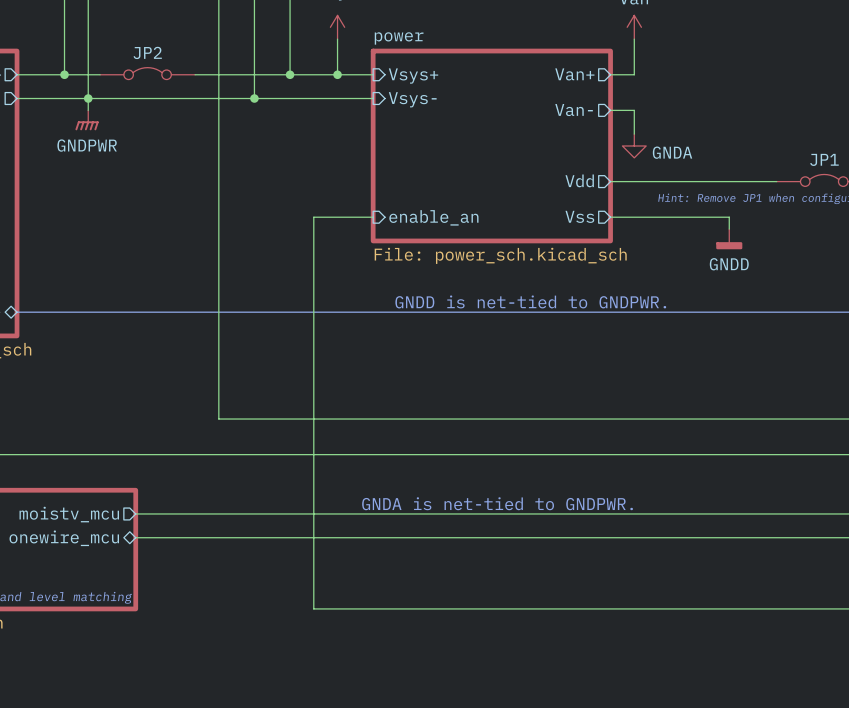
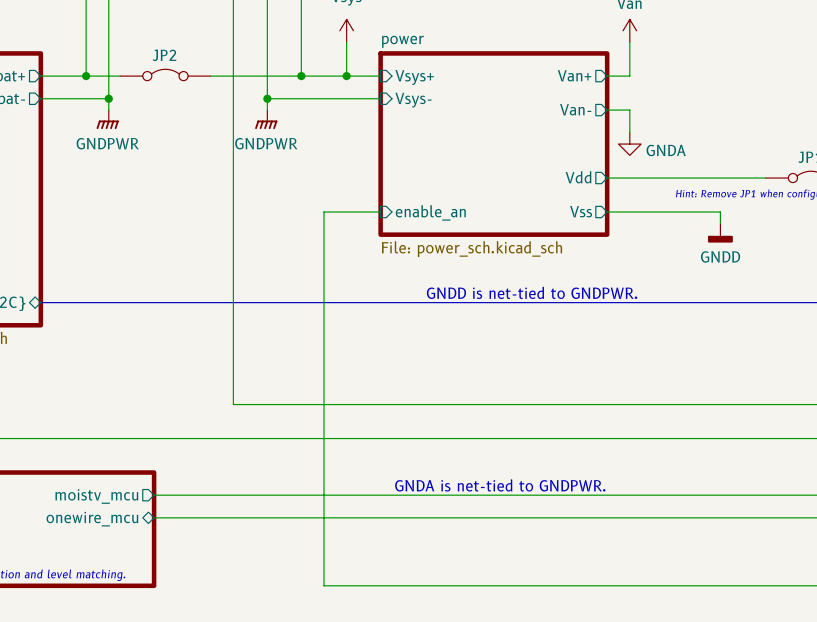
wire: (88, 98) (254, 98) -> (267, 110) (267, 98)
power symbol: none -> GNDPWR (266, 119)

